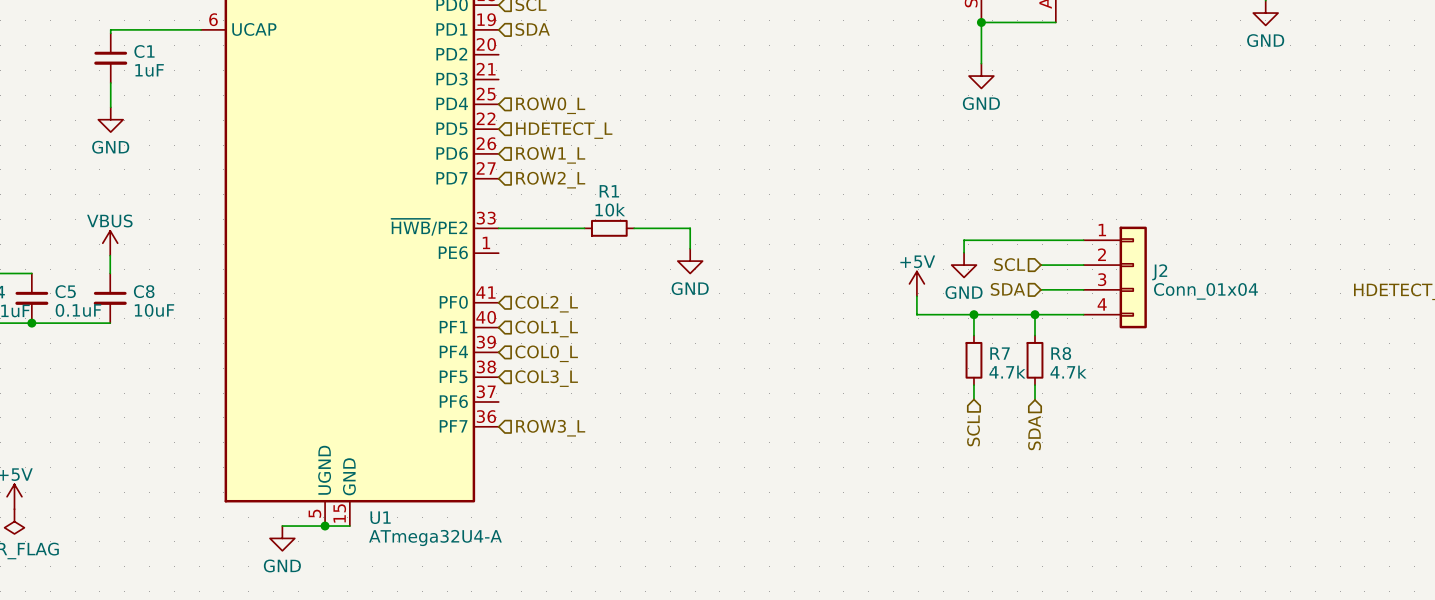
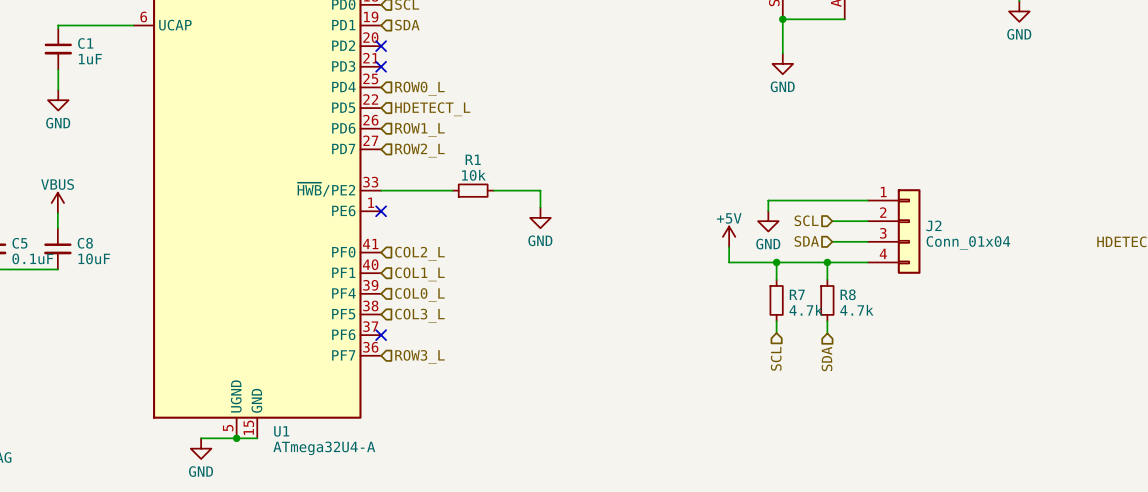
no-connect mark: none -> (381, 46)
no-connect mark: none -> (381, 66)
no-connect mark: none -> (381, 211)
no-connect mark: none -> (381, 335)

